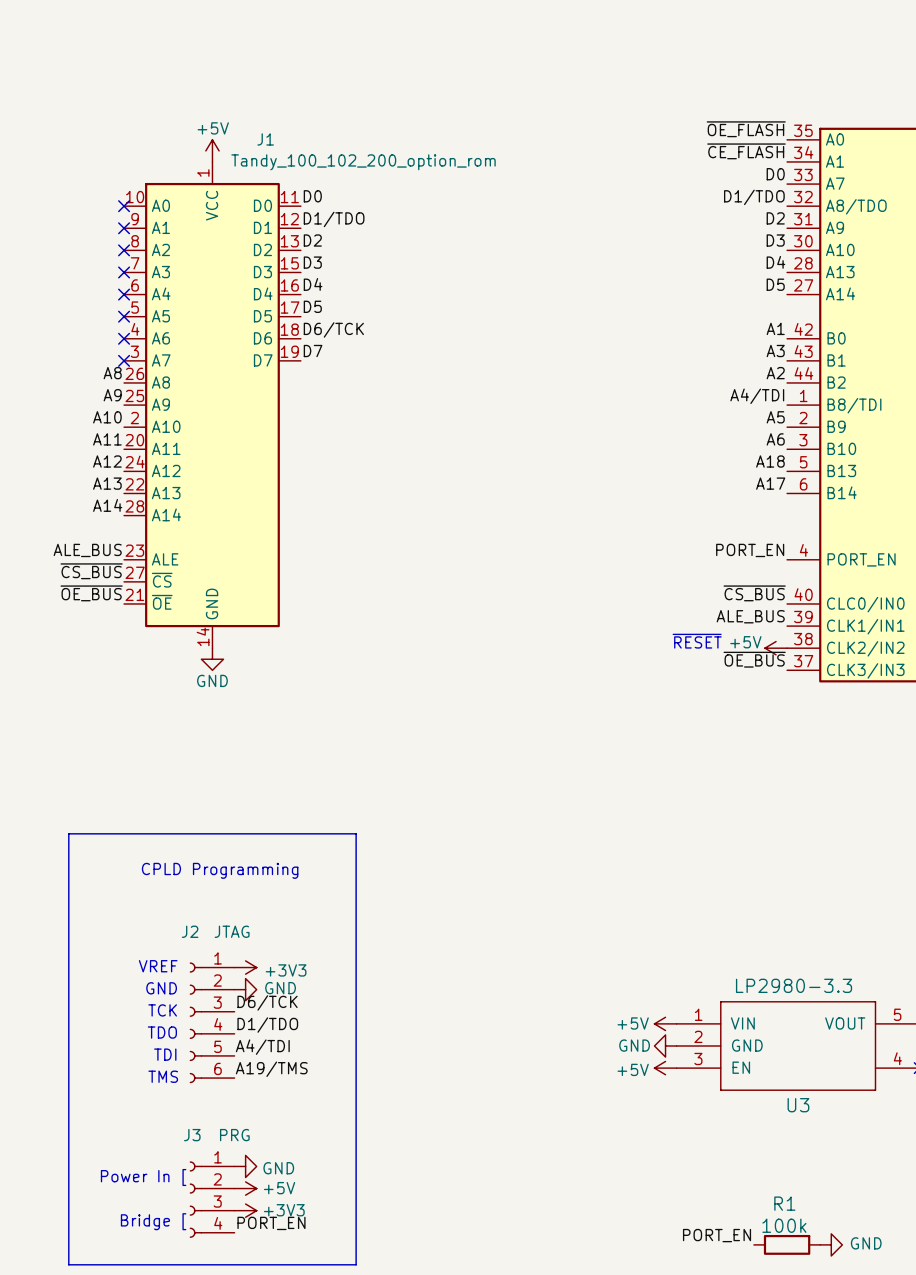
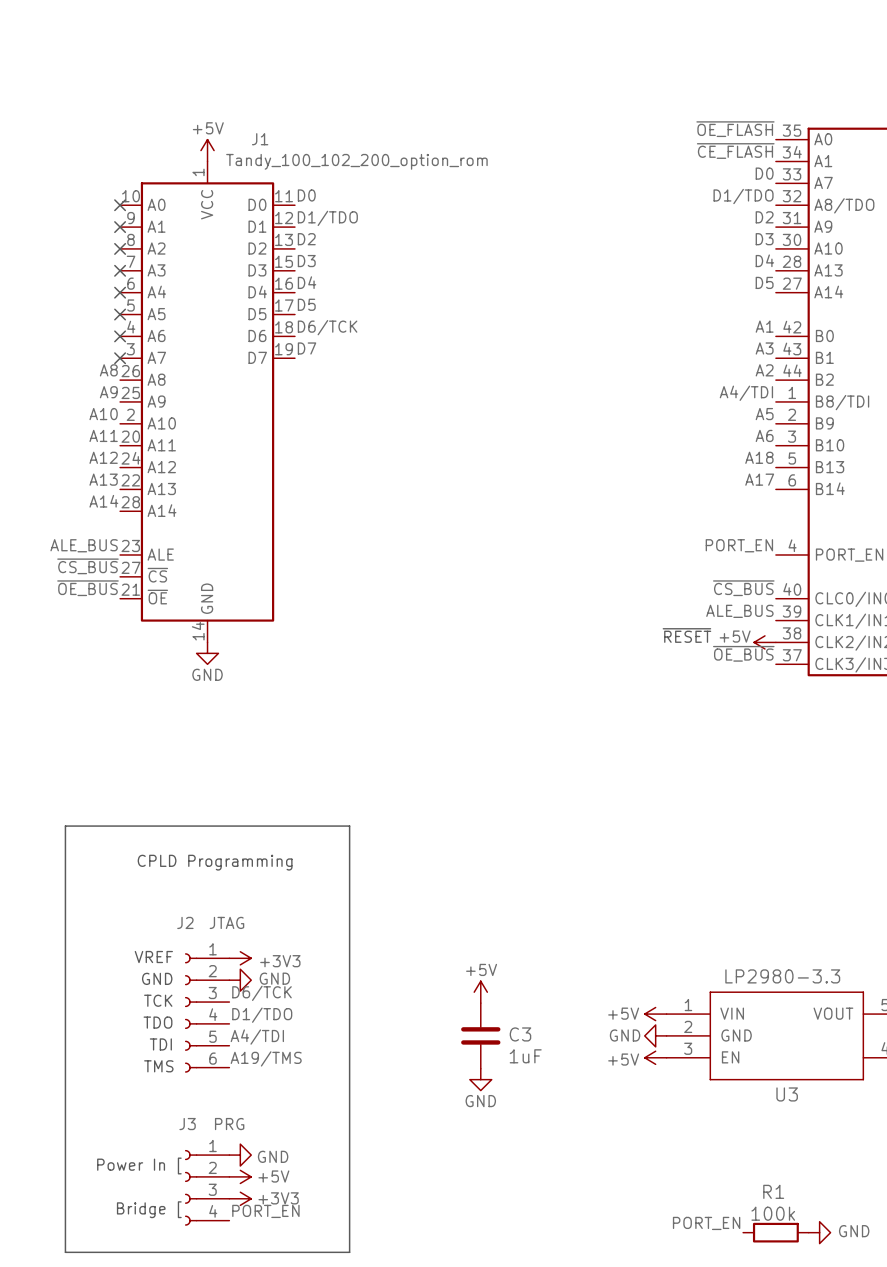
power symbol: none -> +5V (480, 992)
C3: none -> 1uF (480, 1035)
power symbol: none -> GND (480, 1079)

